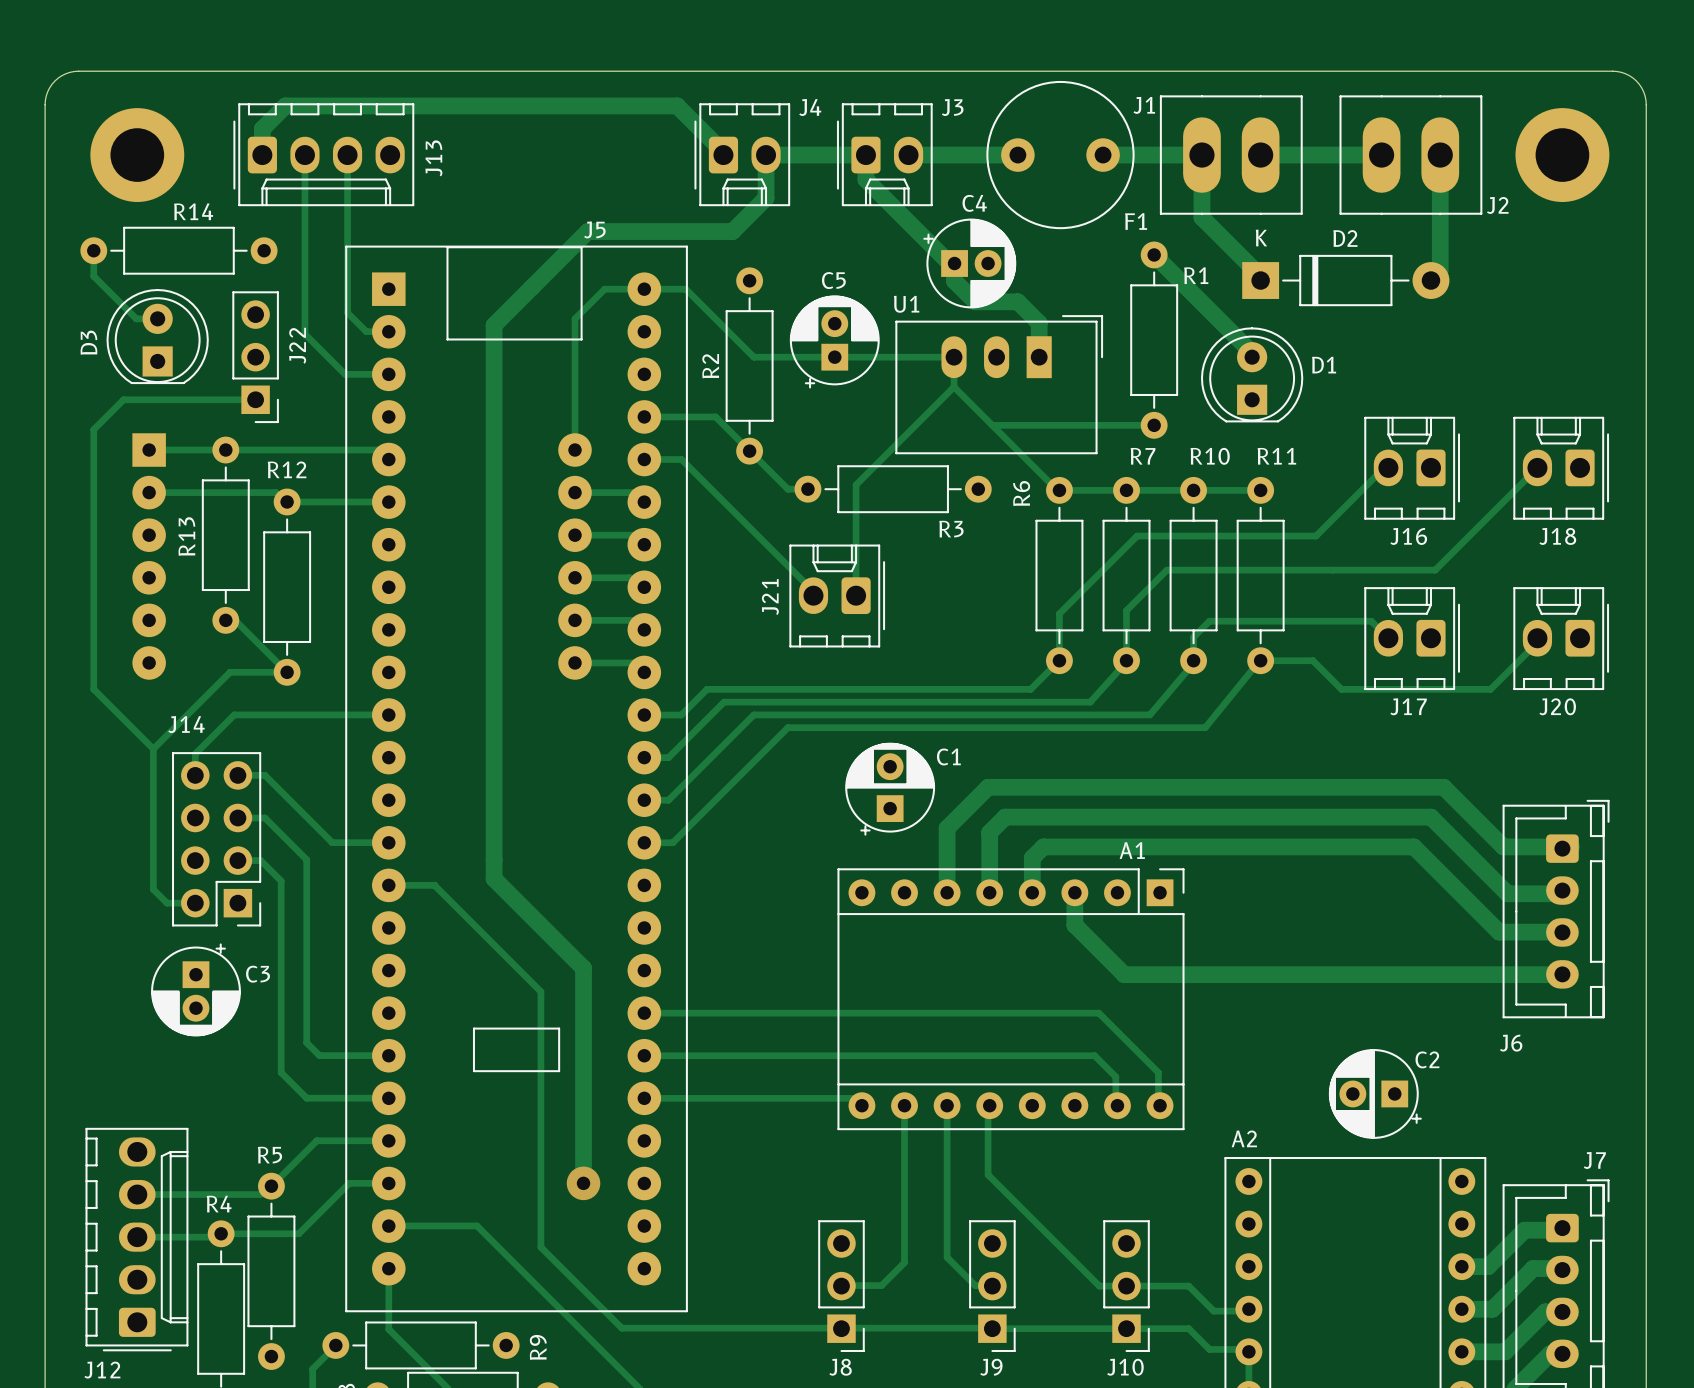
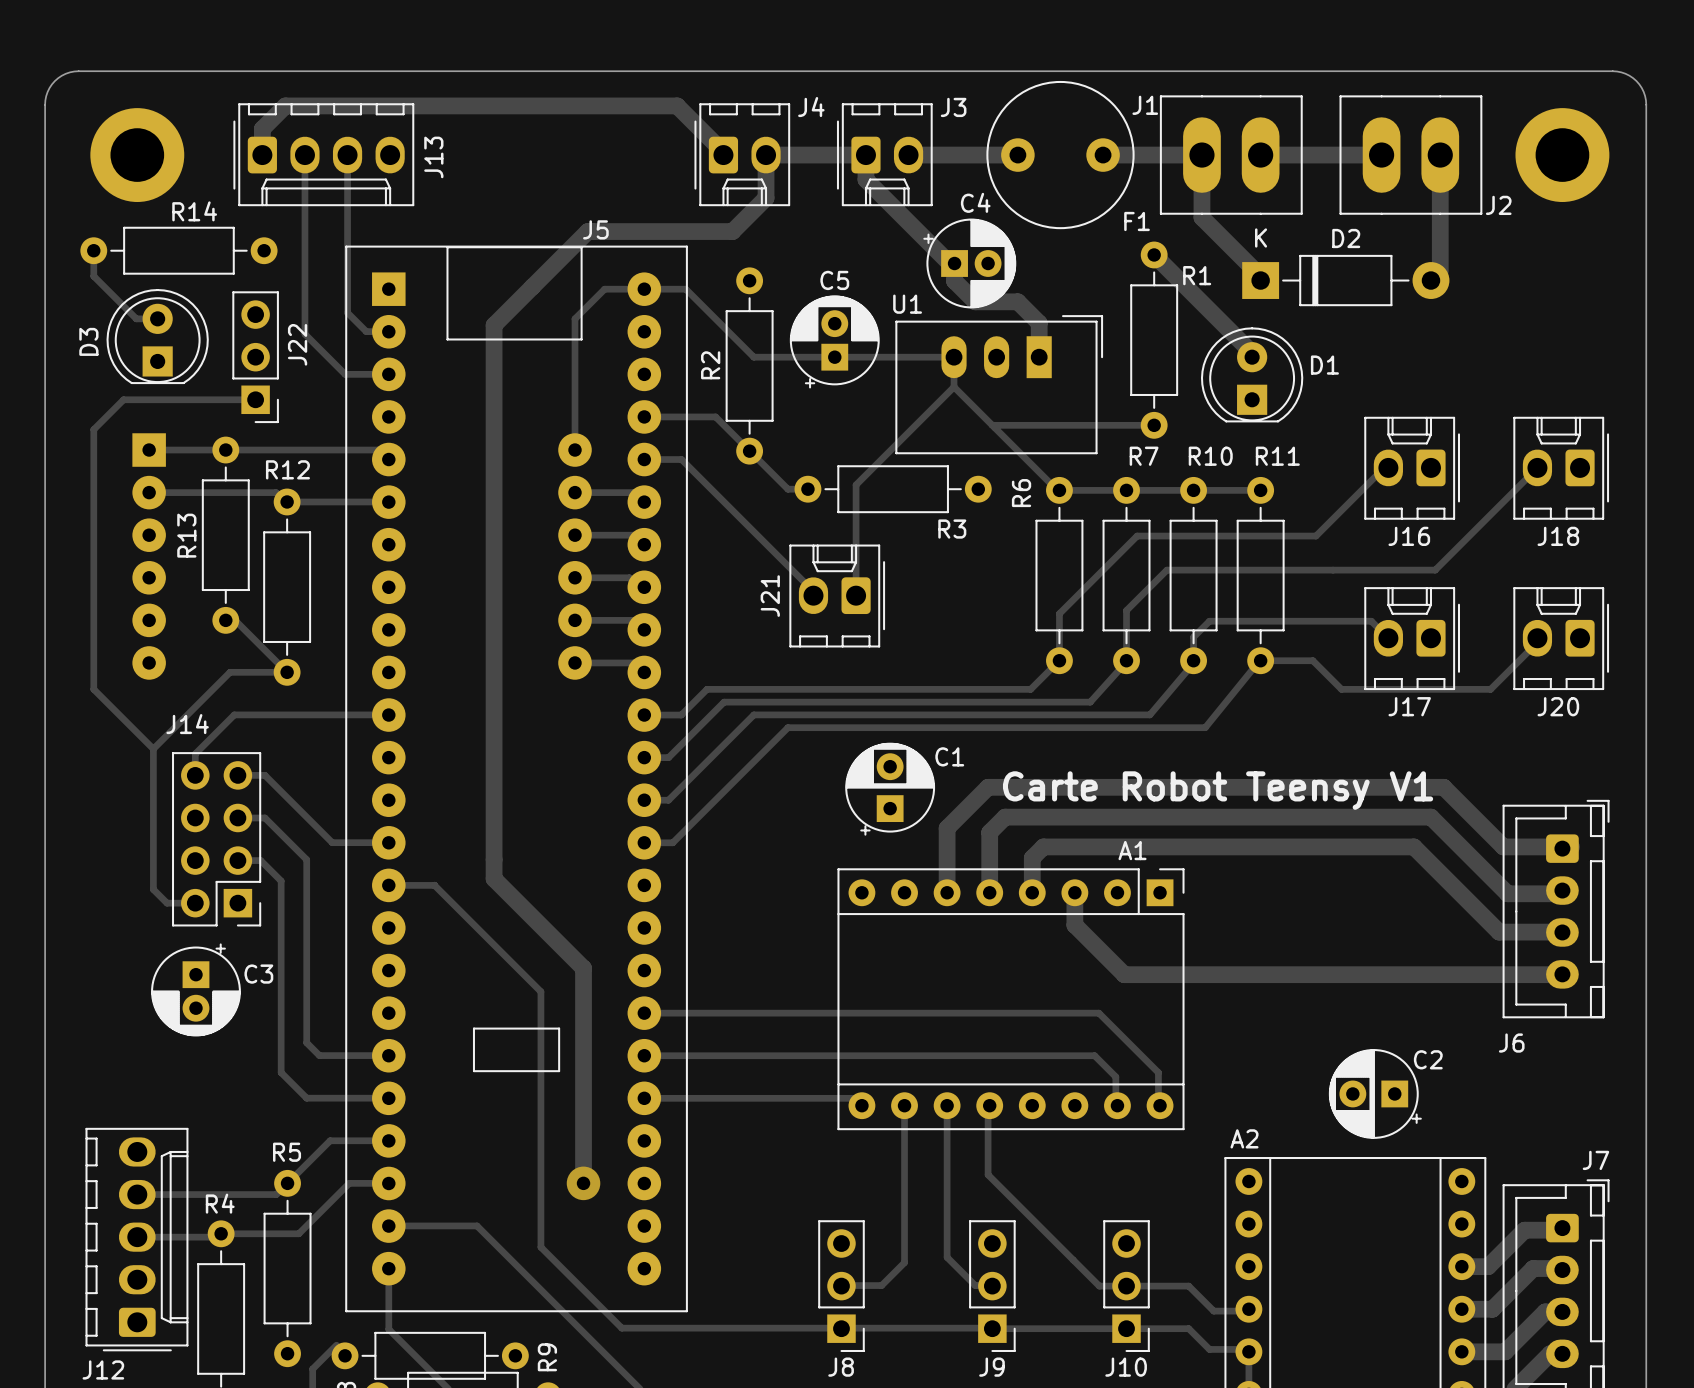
text: none -> Carte Robot Teensy V1 (1218, 790)
track: (330, 1140) (316, 1140) (271, 1186) -> (330, 1140) (276, 1194) (261, 1194)
R5 position: (271, 1271) -> (287, 1268)
R9 position: (420, 1345) -> (430, 1355)

